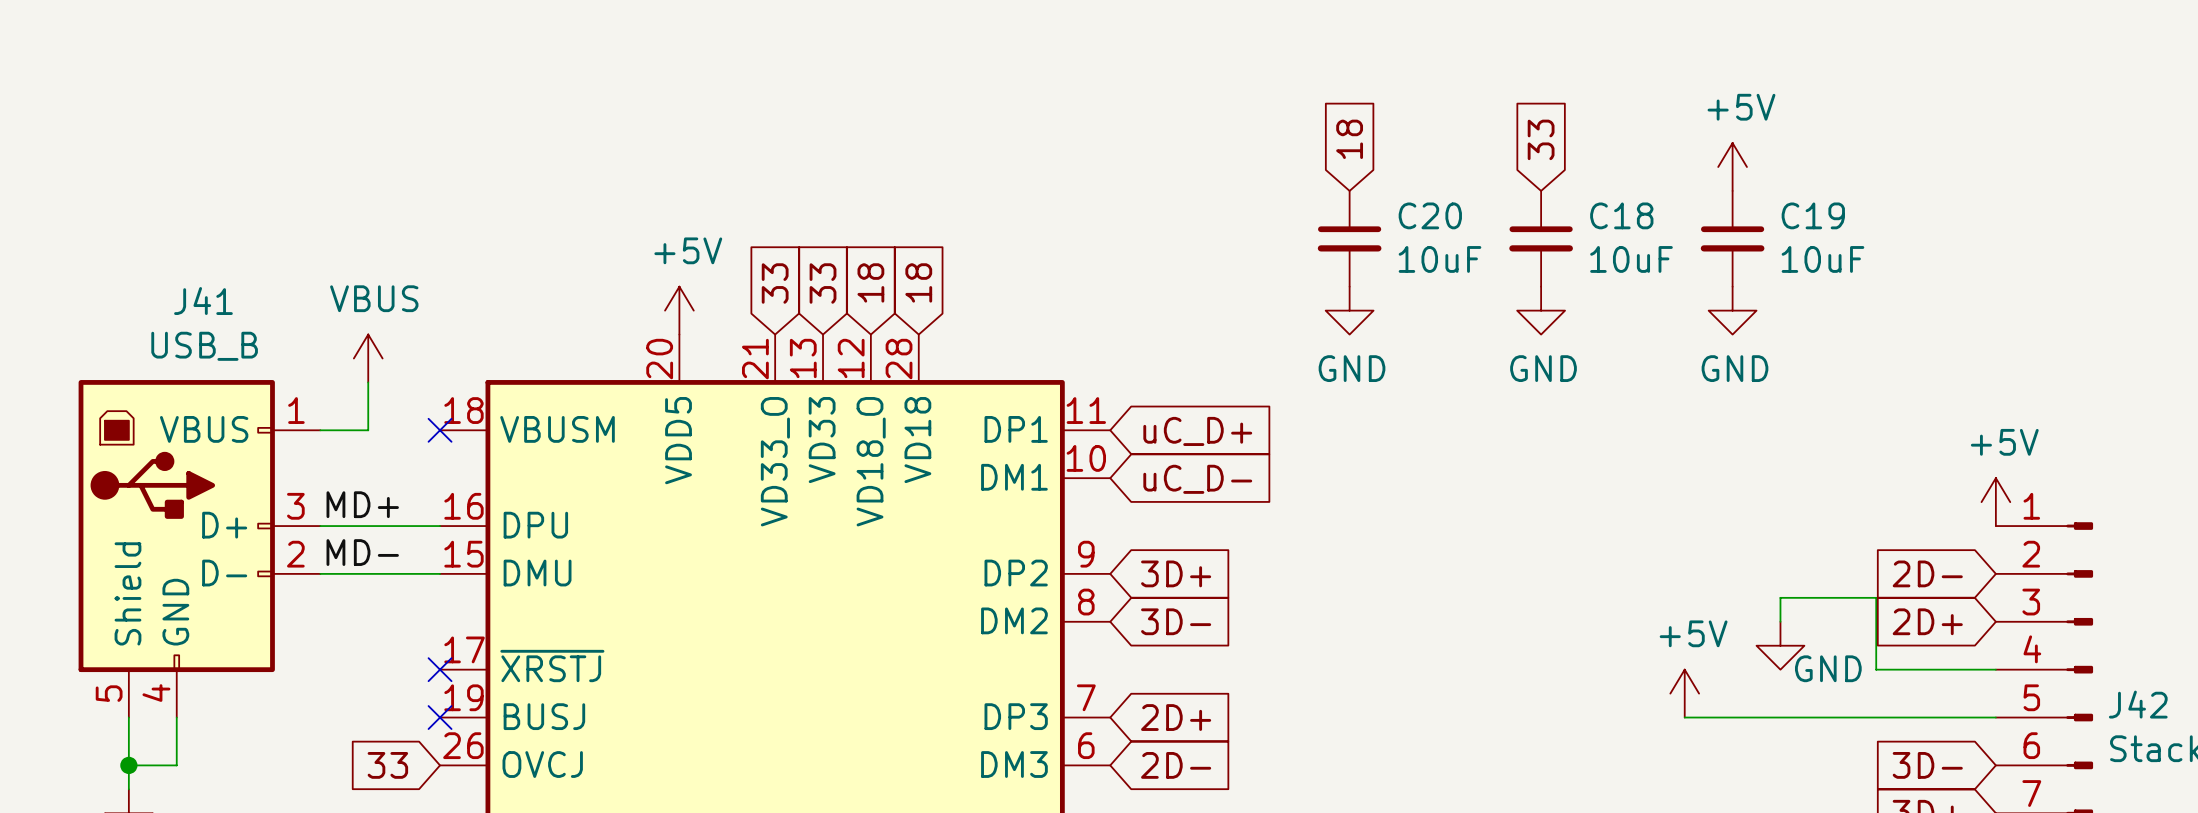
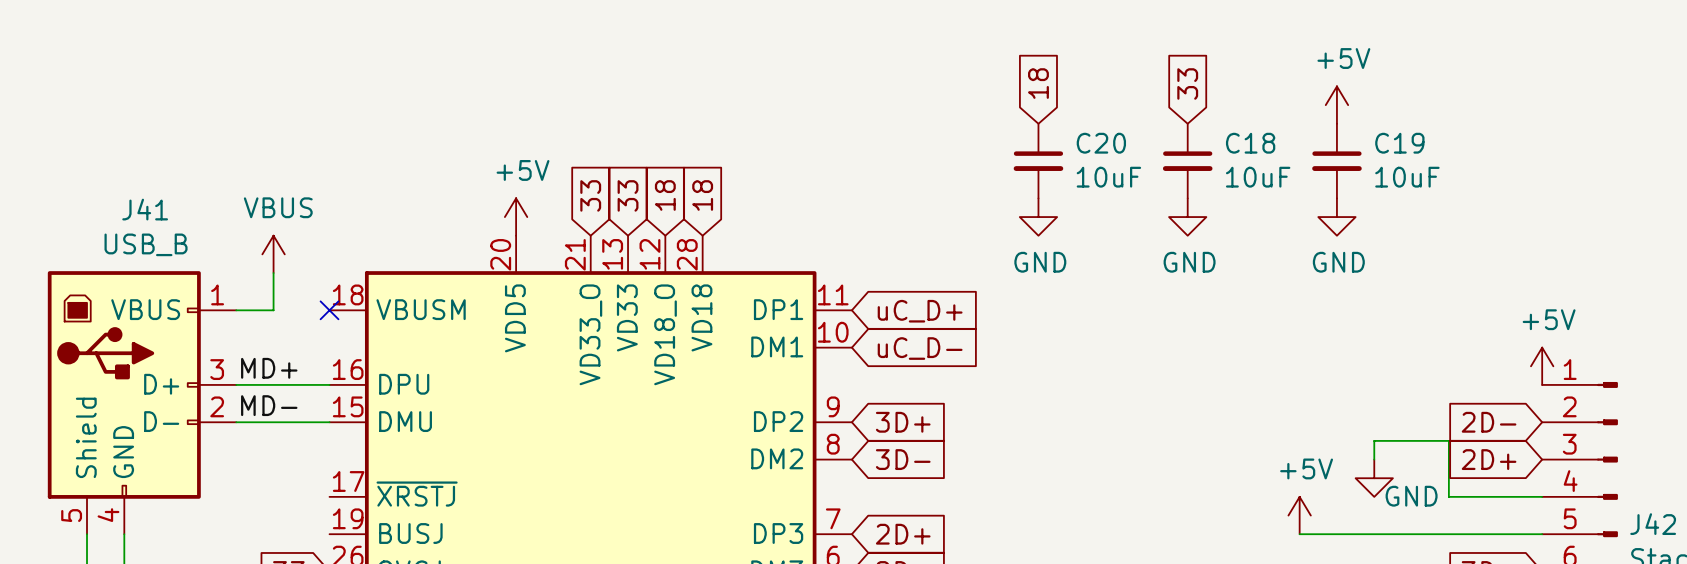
no-connect mark: (440, 669) -> none
no-connect mark: (440, 717) -> none

